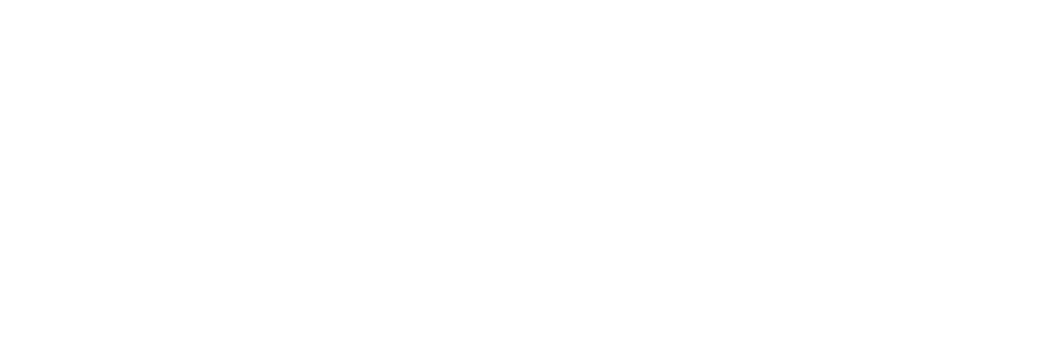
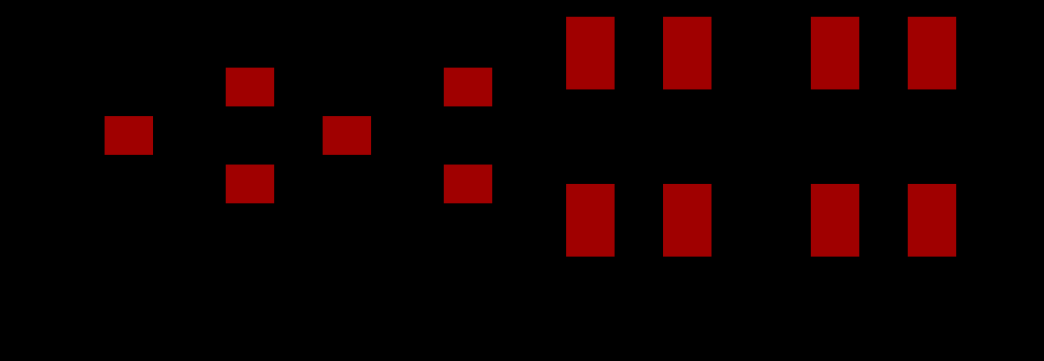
part: none -> (638, 53)
part: none -> (883, 53)
part: none -> (189, 135)
part: none -> (407, 135)
part: none -> (638, 220)
part: none -> (883, 220)

